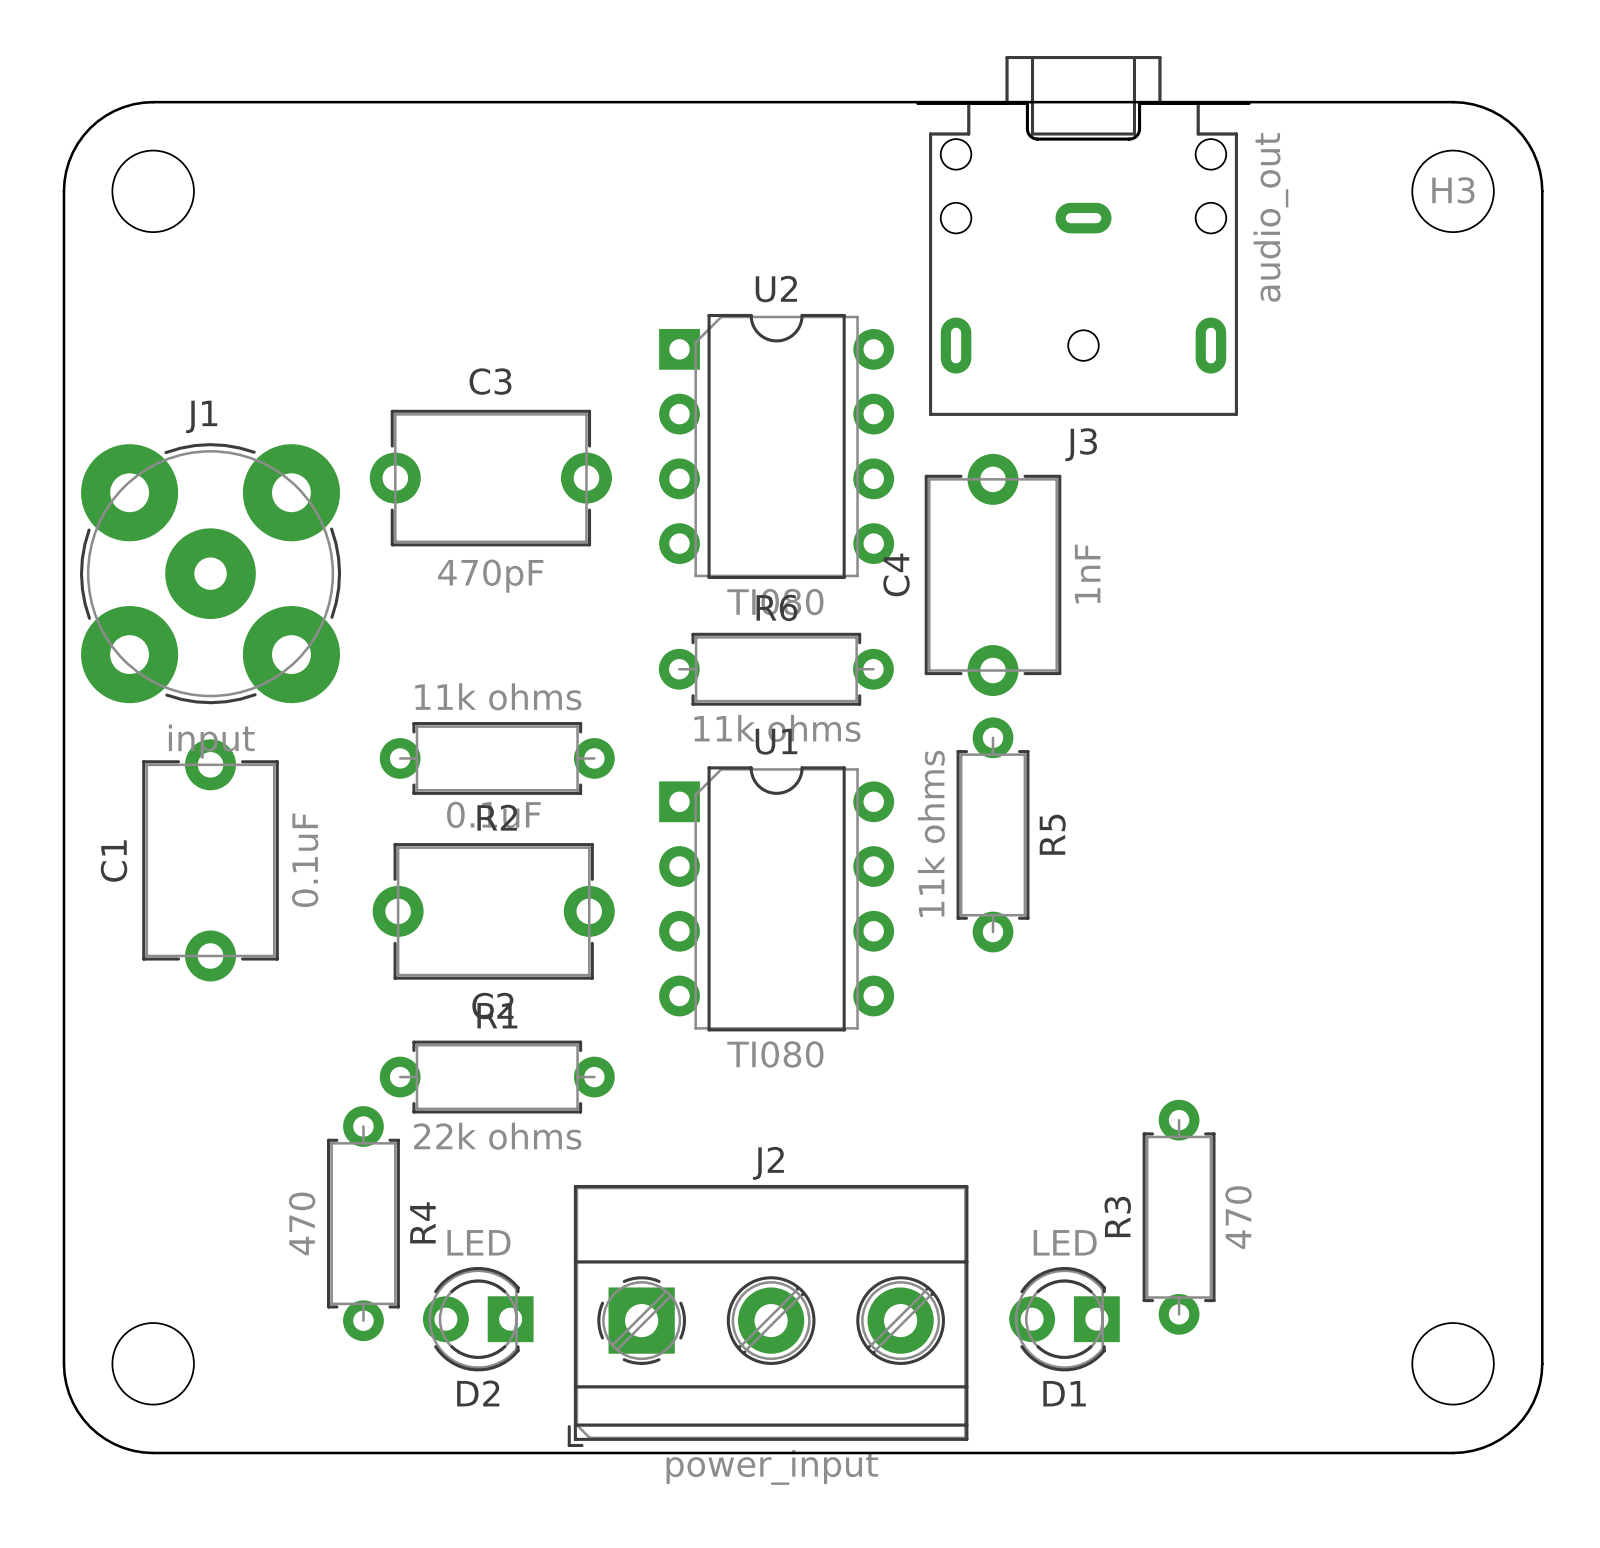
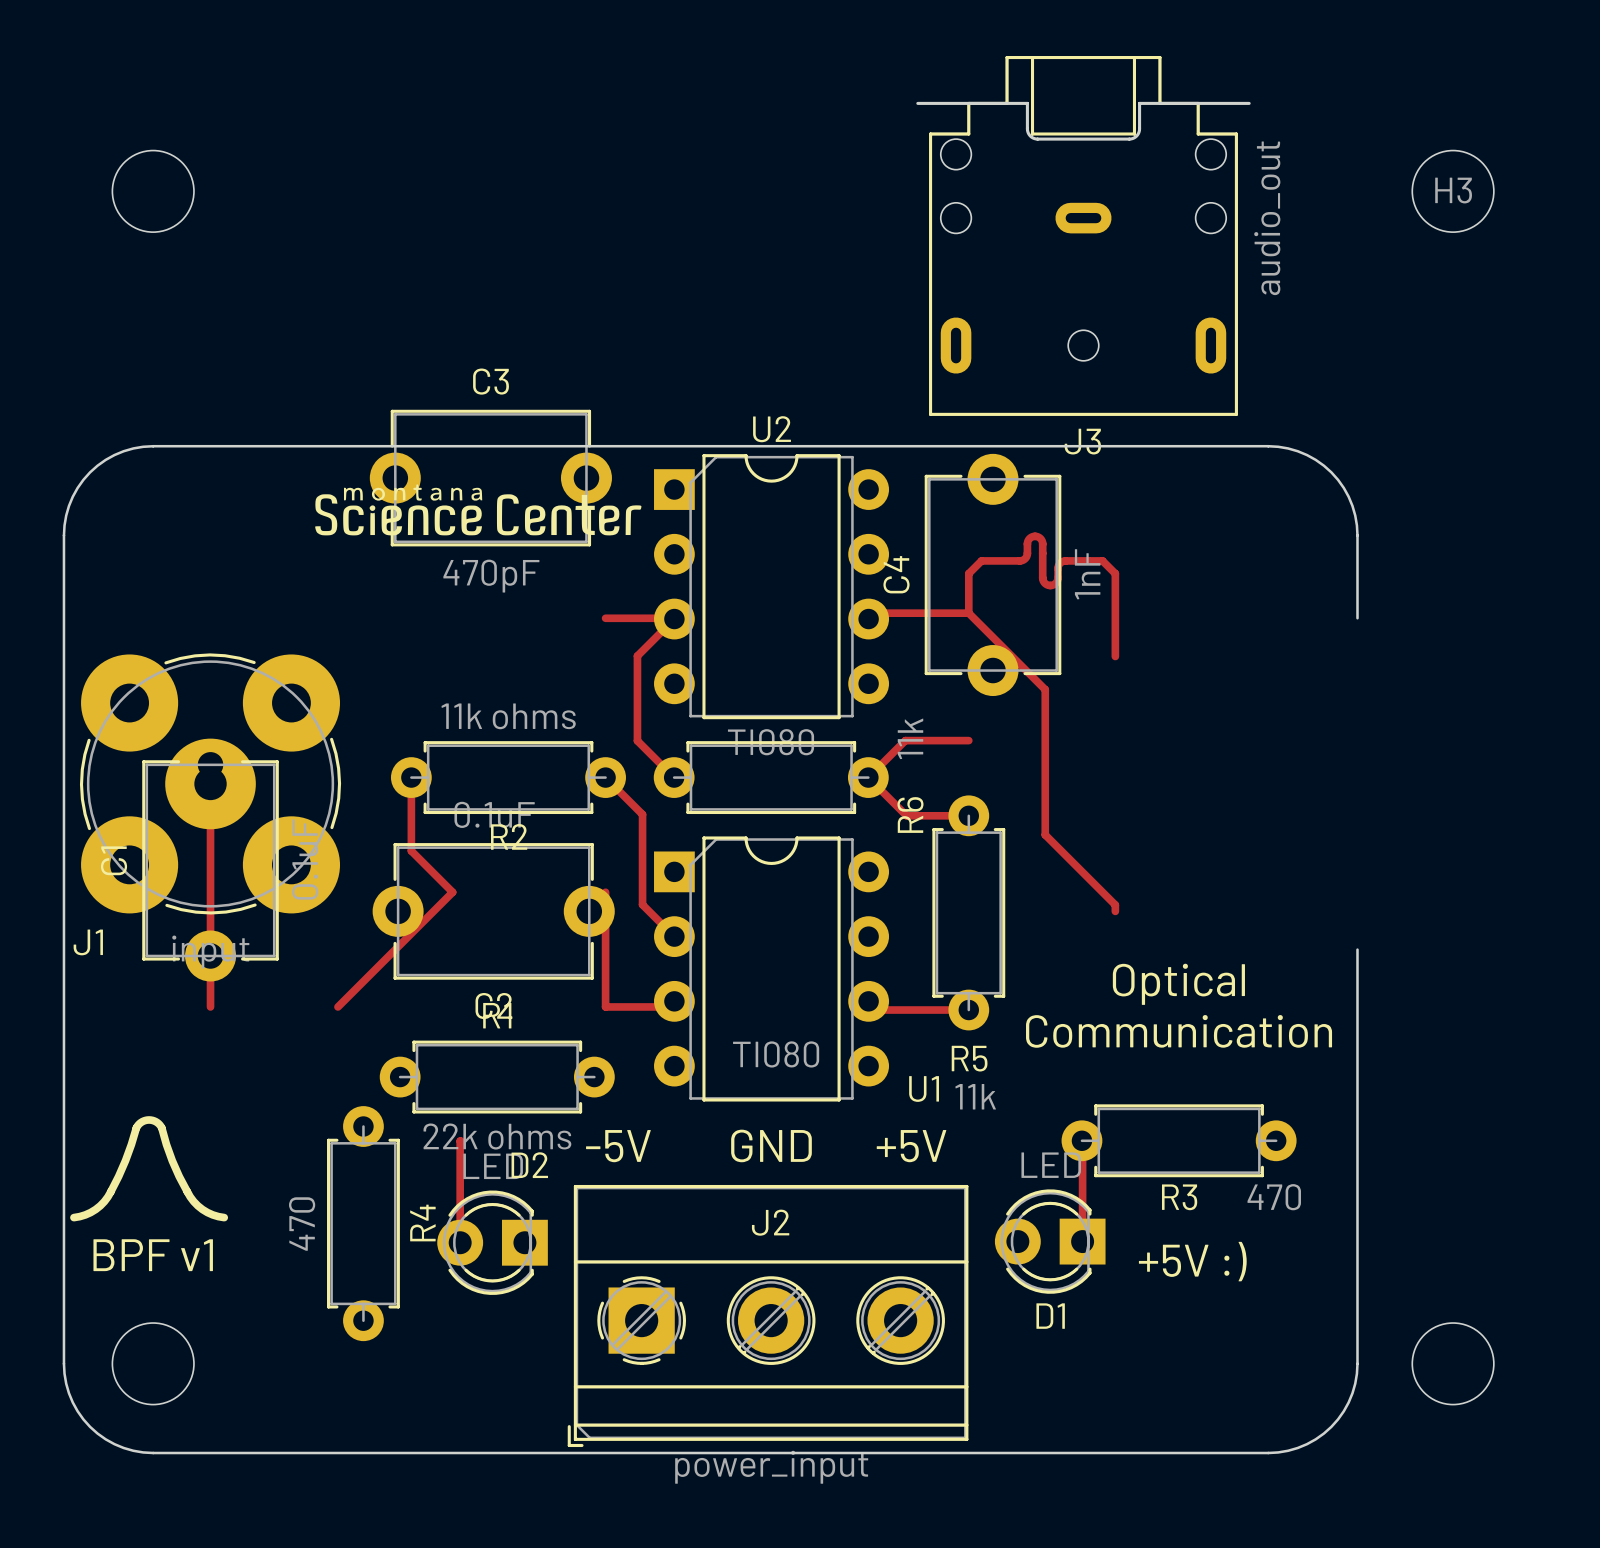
J1 name position: J1 (201, 416) -> J1 (88, 942)
U2 position: (776, 446) -> (771, 586)
drawing: none -> [315, 484, 642, 536]
board edge: (63, 535) (64, 181) (72, 152) (90, 128) (114, 110) (133, 104) (153, 102) (1453, 102) (1482, 107) (1508, 121) (1522, 135) (1533, 152) (1540, 171) (1542, 191) (1542, 1363) (1540, 1383) (1533, 1402) (1516, 1426) (1500, 1439) (1472, 1450) (1453, 1453) (1268, 1453) -> (63, 535) (68, 505) (83, 479) (105, 459) (123, 451) (143, 446) (1278, 446) (1297, 451) (1323, 465) (1338, 479) (1348, 496) (1356, 525) (1357, 618)
J1 position: (210, 573) -> (210, 783)
R6 name rotation: 0° (776, 607) -> 90° counterclockwise (910, 815)
R6 name position: R6 (776, 607) -> R6 (910, 815)
track: none -> (968, 613) (1045, 689) (1045, 834) (1115, 905) (1115, 911)
track: none -> (968, 613) (968, 573) (981, 560) (1023, 559) (1027, 555) (1028, 540) (1032, 536) (1037, 536) (1042, 542) (1042, 578) (1047, 584) (1052, 585) (1056, 582) (1058, 565) (1064, 560) (1102, 560) (1115, 573) (1115, 656)
track: none -> (968, 613) (874, 613) (868, 619)
track: none -> (605, 618) (674, 619) (637, 655) (637, 740) (674, 777)
R6 position: (776, 669) -> (771, 777)
R6 value: 11k ohms (777, 728) -> 11k (910, 738)
track: none -> (968, 740) (905, 740) (868, 777) (906, 815) (968, 815)
U1 name position: U1 (776, 741) -> U1 (924, 1088)
R2 position: (497, 758) -> (508, 777)
track: none -> (210, 777) (210, 1006)
track: none -> (411, 777) (411, 850) (452, 892) (337, 1006)
track: none -> (605, 777) (642, 814) (642, 904) (674, 936)
R5 value: 11k ohms (931, 833) -> 11k (975, 1096)
R5 position: (993, 834) -> (968, 912)
R5 name rotation: 0° (1052, 834) -> 90° clockwise (969, 1058)
R5 name position: R5 (1052, 834) -> R5 (969, 1058)
track: none -> (605, 892) (605, 1006) (668, 1006) (674, 1001)
U1 position: (776, 898) -> (771, 968)
board edge: none -> (1357, 949) (1357, 1363) (1355, 1383) (1343, 1411) (1323, 1433) (1297, 1448) (1268, 1453)
text: none -> Optical (1178, 984)
track: none -> (868, 1001) (877, 1010) (968, 1010)
text: none -> Communication (1179, 1031)
track: none -> (460, 1140) (460, 1242)
track: none -> (1081, 1140) (1082, 1241)
text: none -> GND (771, 1145)
text: none -> -5V (618, 1146)
text: none -> +5V (911, 1146)
J2 name position: J2 (768, 1163) -> J2 (770, 1222)
R3 name position: R3 (1117, 1216) -> R3 (1179, 1197)
line: none -> (73, 1217) (90, 1212) (104, 1201) (125, 1160) (136, 1128) (142, 1121) (149, 1119) (155, 1121) (161, 1128) (172, 1160) (193, 1201) (207, 1212) (224, 1217)
R3 rotation: 0° (1179, 1217) -> 90° clockwise (1179, 1140)
R3 value position: 470 (1238, 1217) -> 470 (1274, 1197)
text: none -> BPF v1 (153, 1255)
text: none -> +5V :) (1192, 1261)
D2 position: (478, 1319) -> (492, 1242)
D1 position: (1064, 1319) -> (1050, 1241)
D2 name position: D2 (478, 1393) -> D2 (529, 1165)

